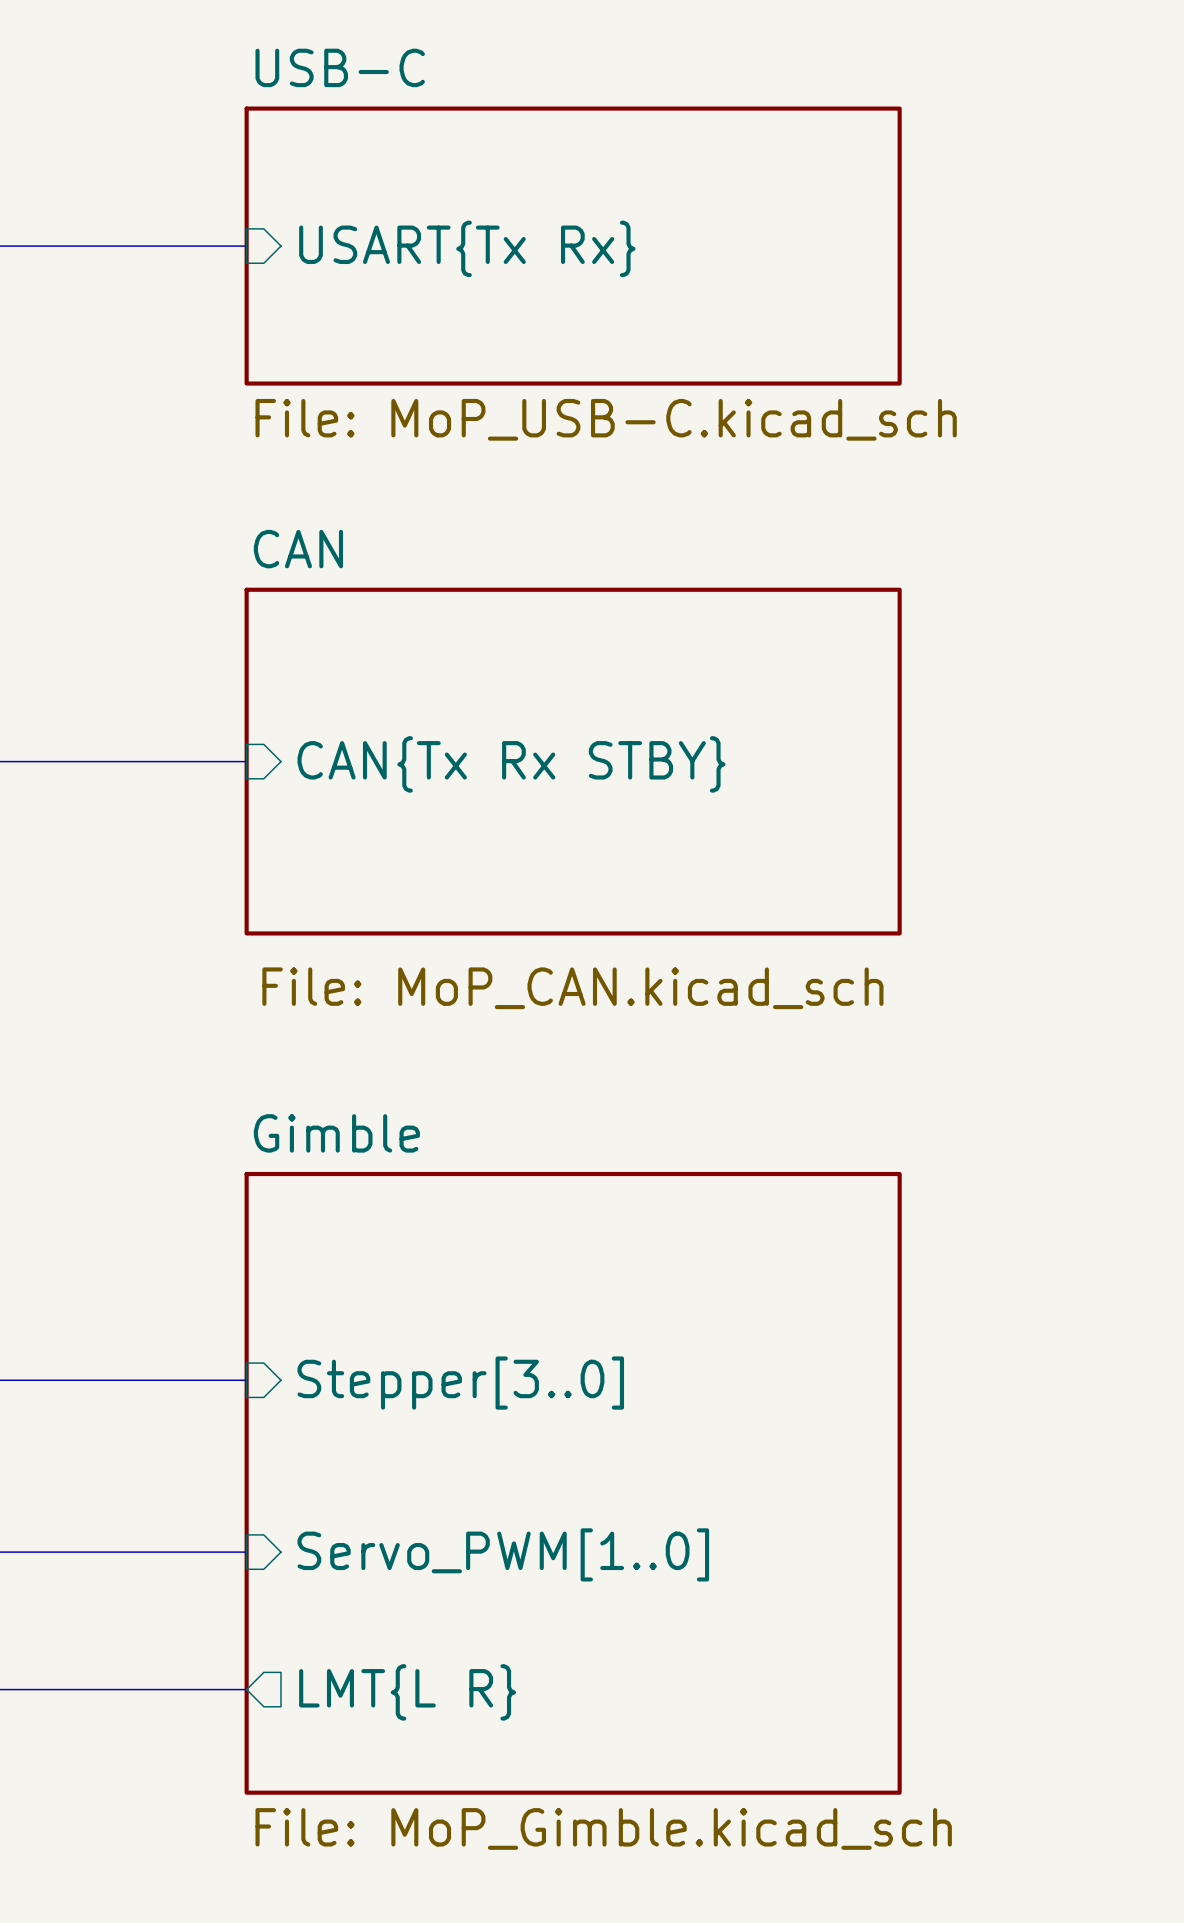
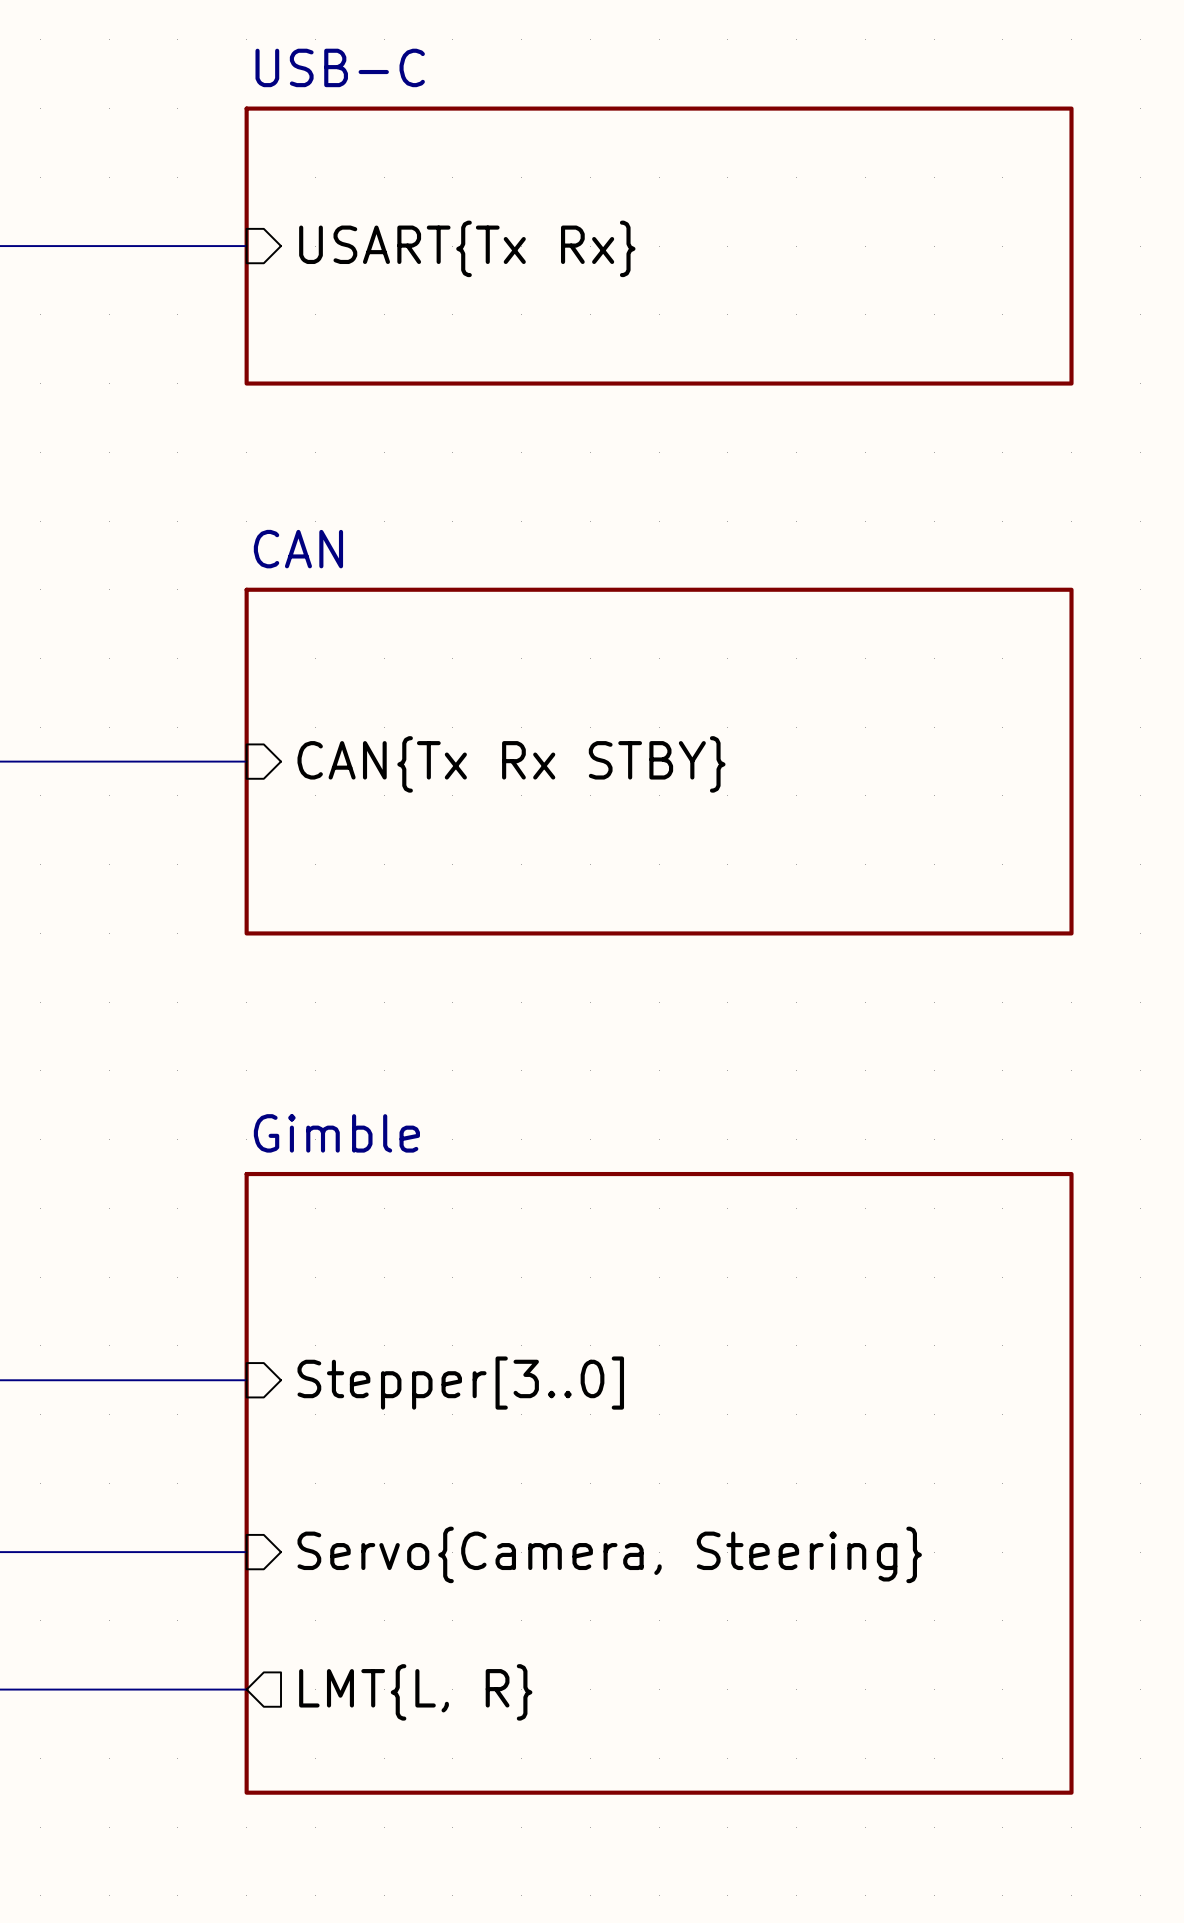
sheet USB-C: File: MoP_USB-C.kicad_sch (573, 246) -> none
sheet USB-C: none -> (659, 246)
sheet CAN: File: MoP_CAN.kicad_sch (573, 761) -> none
sheet CAN: none -> (659, 761)
sheet Gimble: File: MoP_Gimble.kicad_sch (573, 1483) -> none
sheet Gimble: none -> (659, 1483)
sheet pin: Servo_PWM[1..0] (503, 1554) -> Servo{Camera, Steering} (609, 1554)
sheet pin: LMT{L R} (407, 1692) -> LMT{L, R} (415, 1692)

